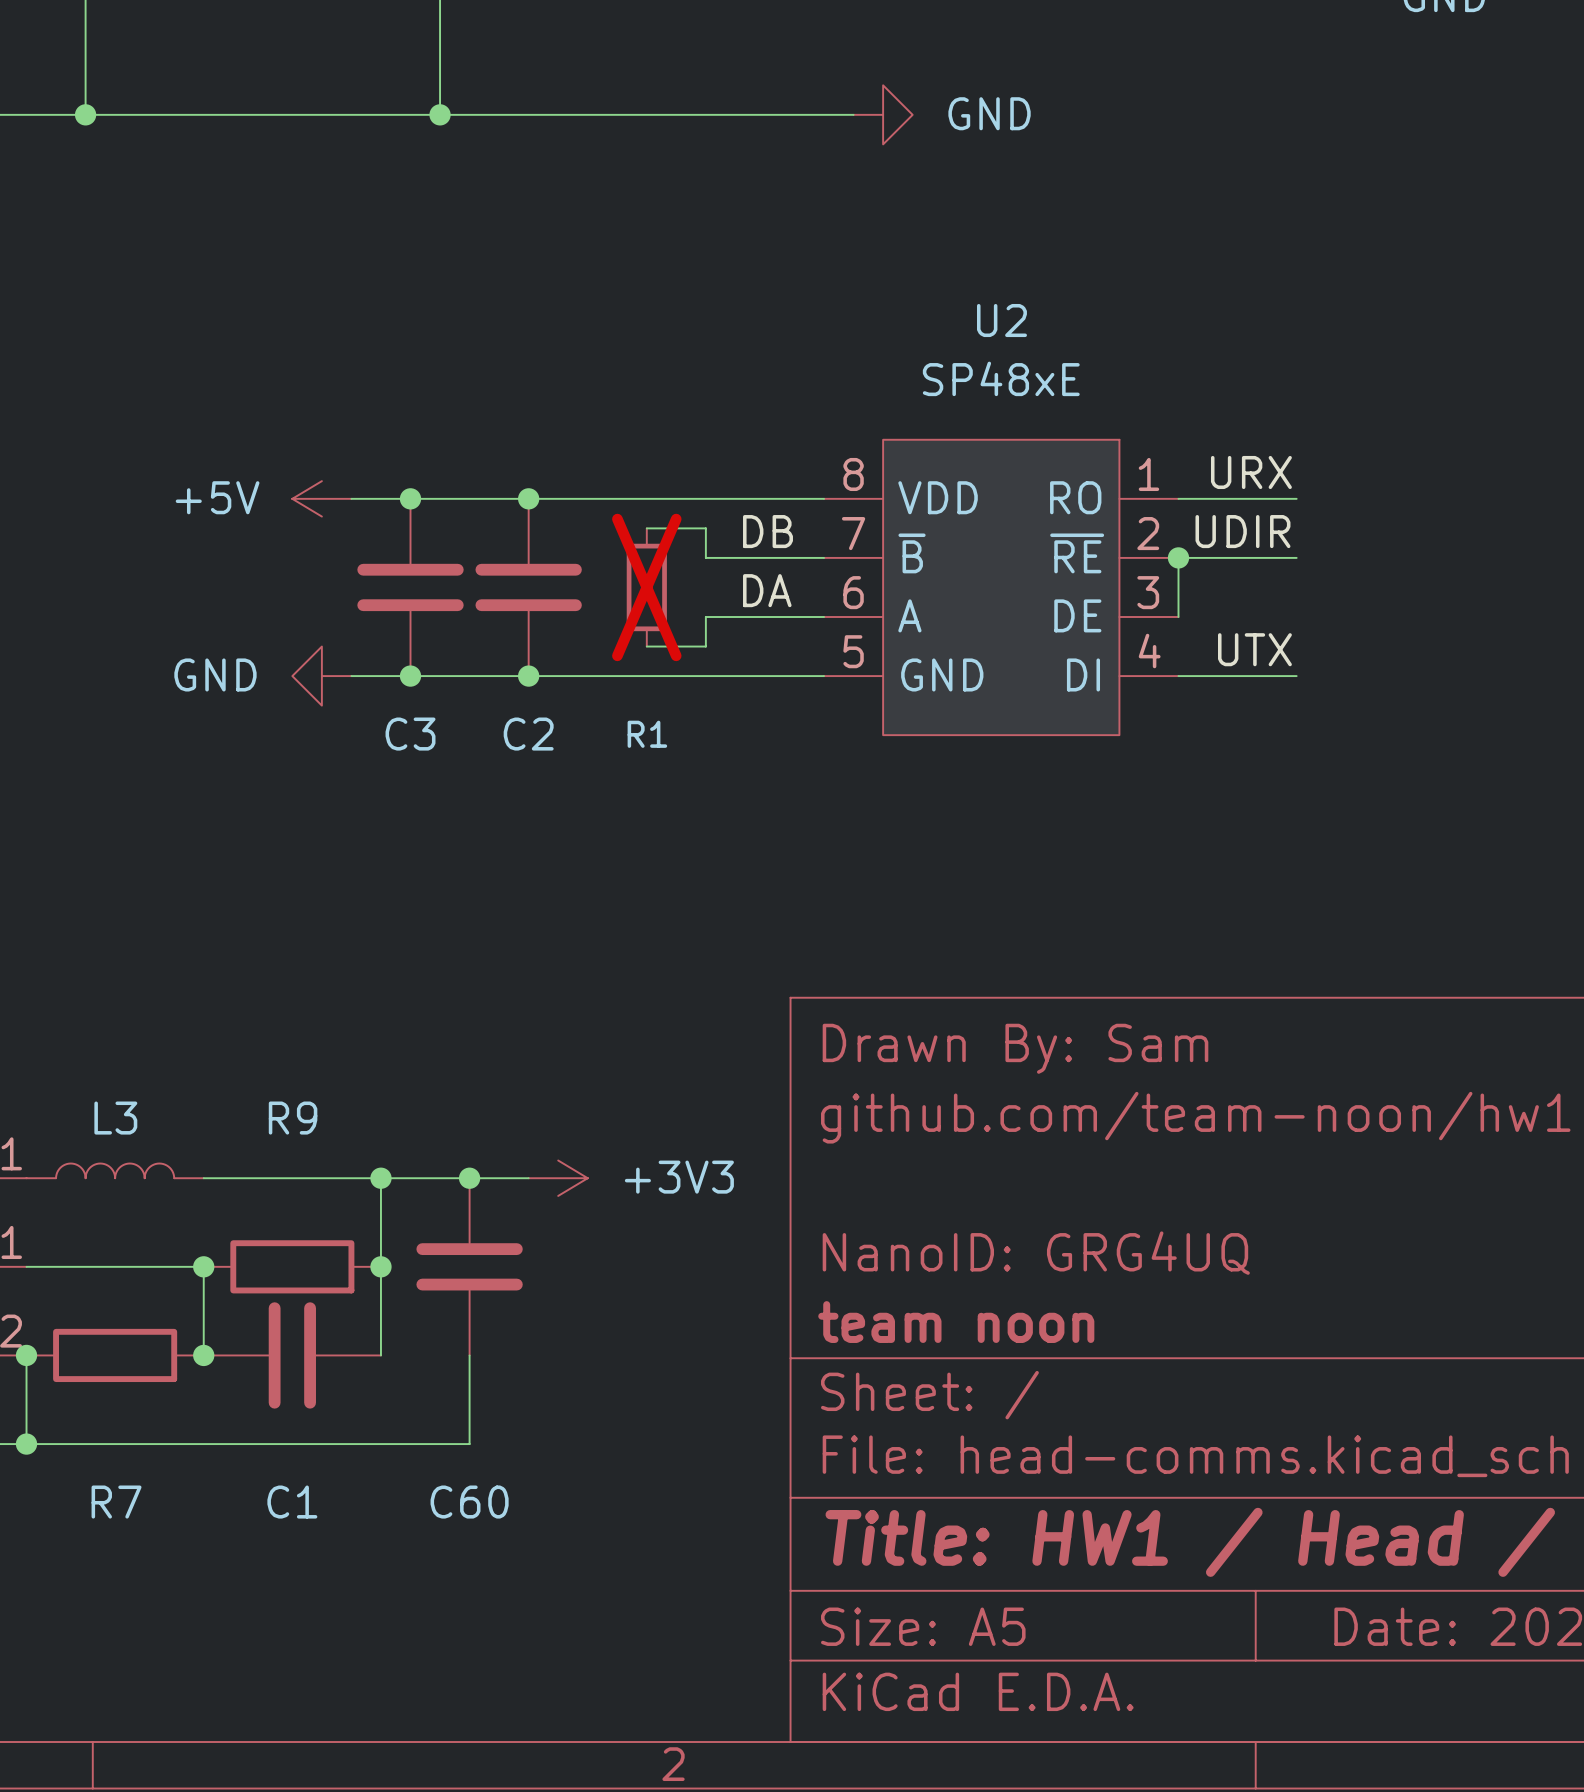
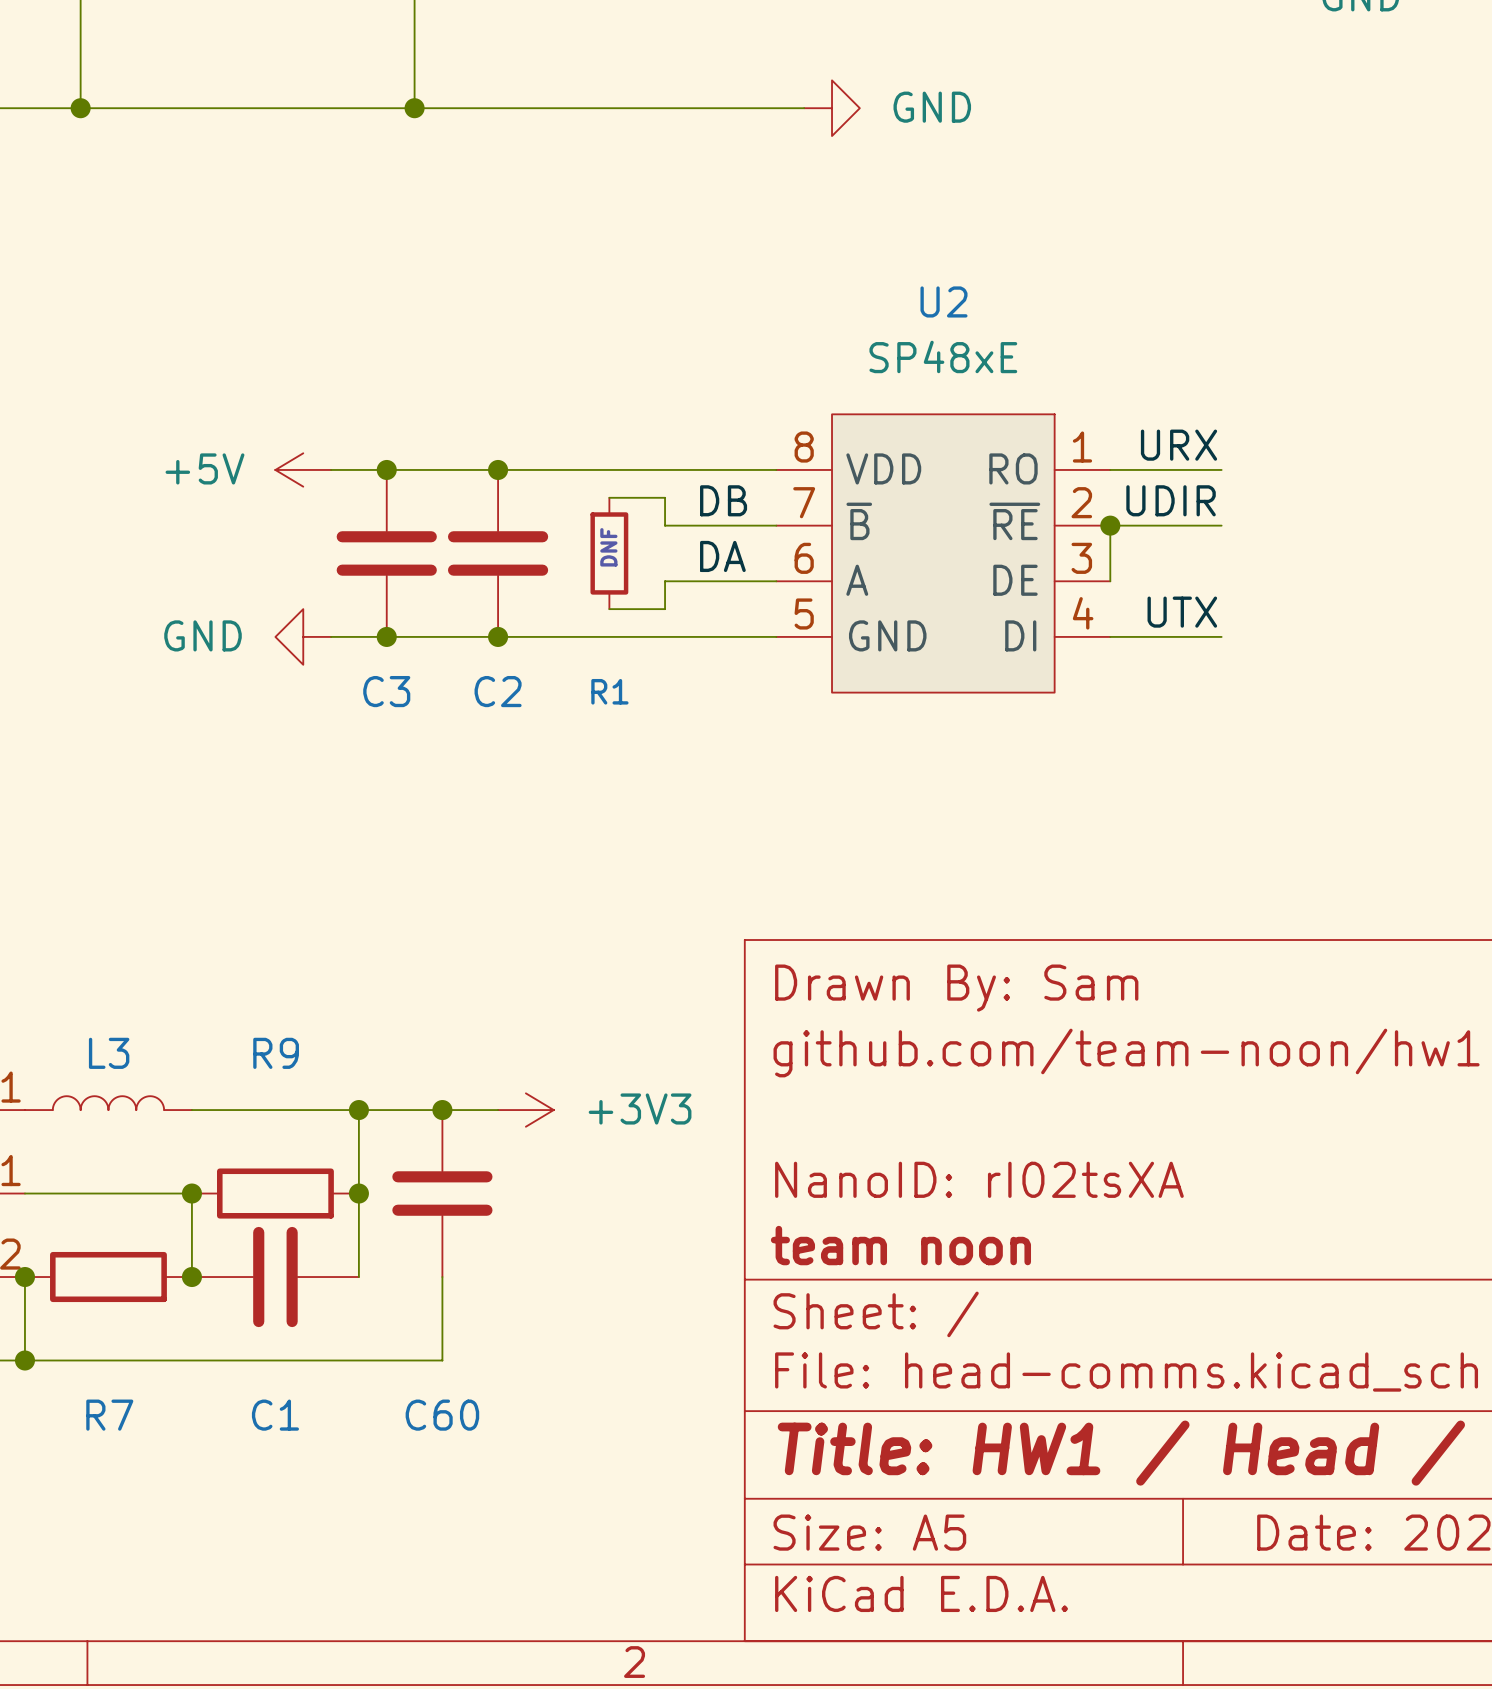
text: none -> DNF (608, 547)
R1 do-not-place cross: (646, 587) -> none
title block: NanoID: GRG4UQ (1036, 1253) -> NanoID: rI02tsXA (979, 1179)

